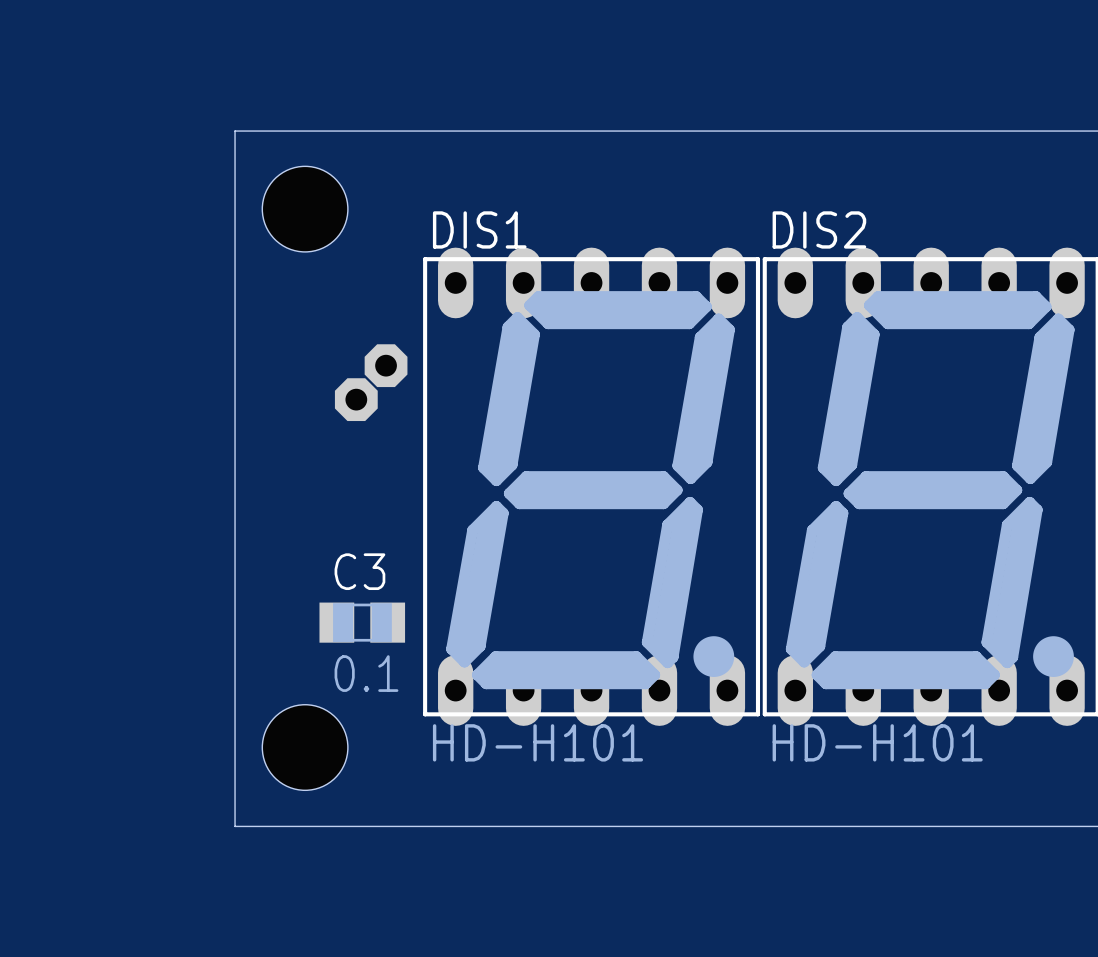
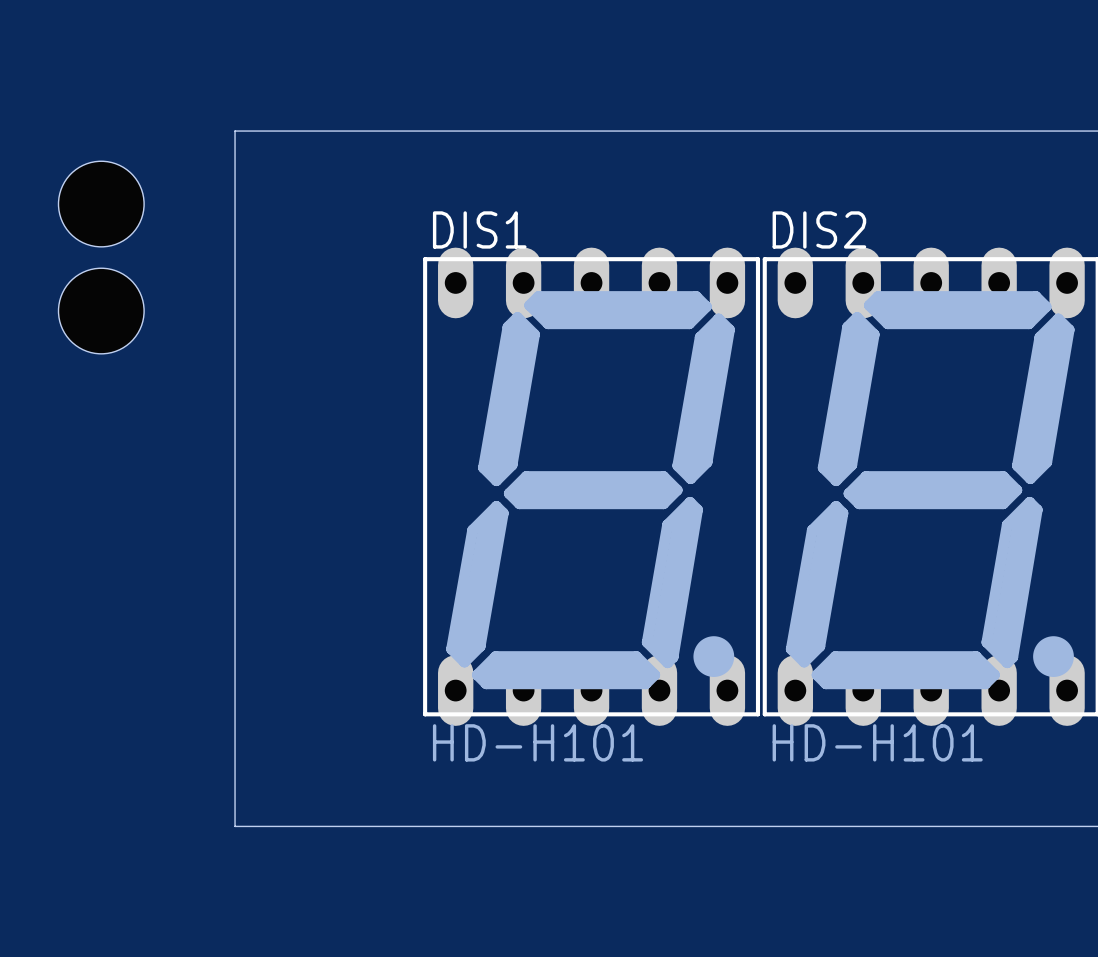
hole: none -> (101, 204)
hole: (305, 209) -> none
hole: none -> (101, 311)
part: (386, 365) -> none
part: (356, 399) -> none
C3: 0.1 (362, 622) -> none
hole: (305, 747) -> none

